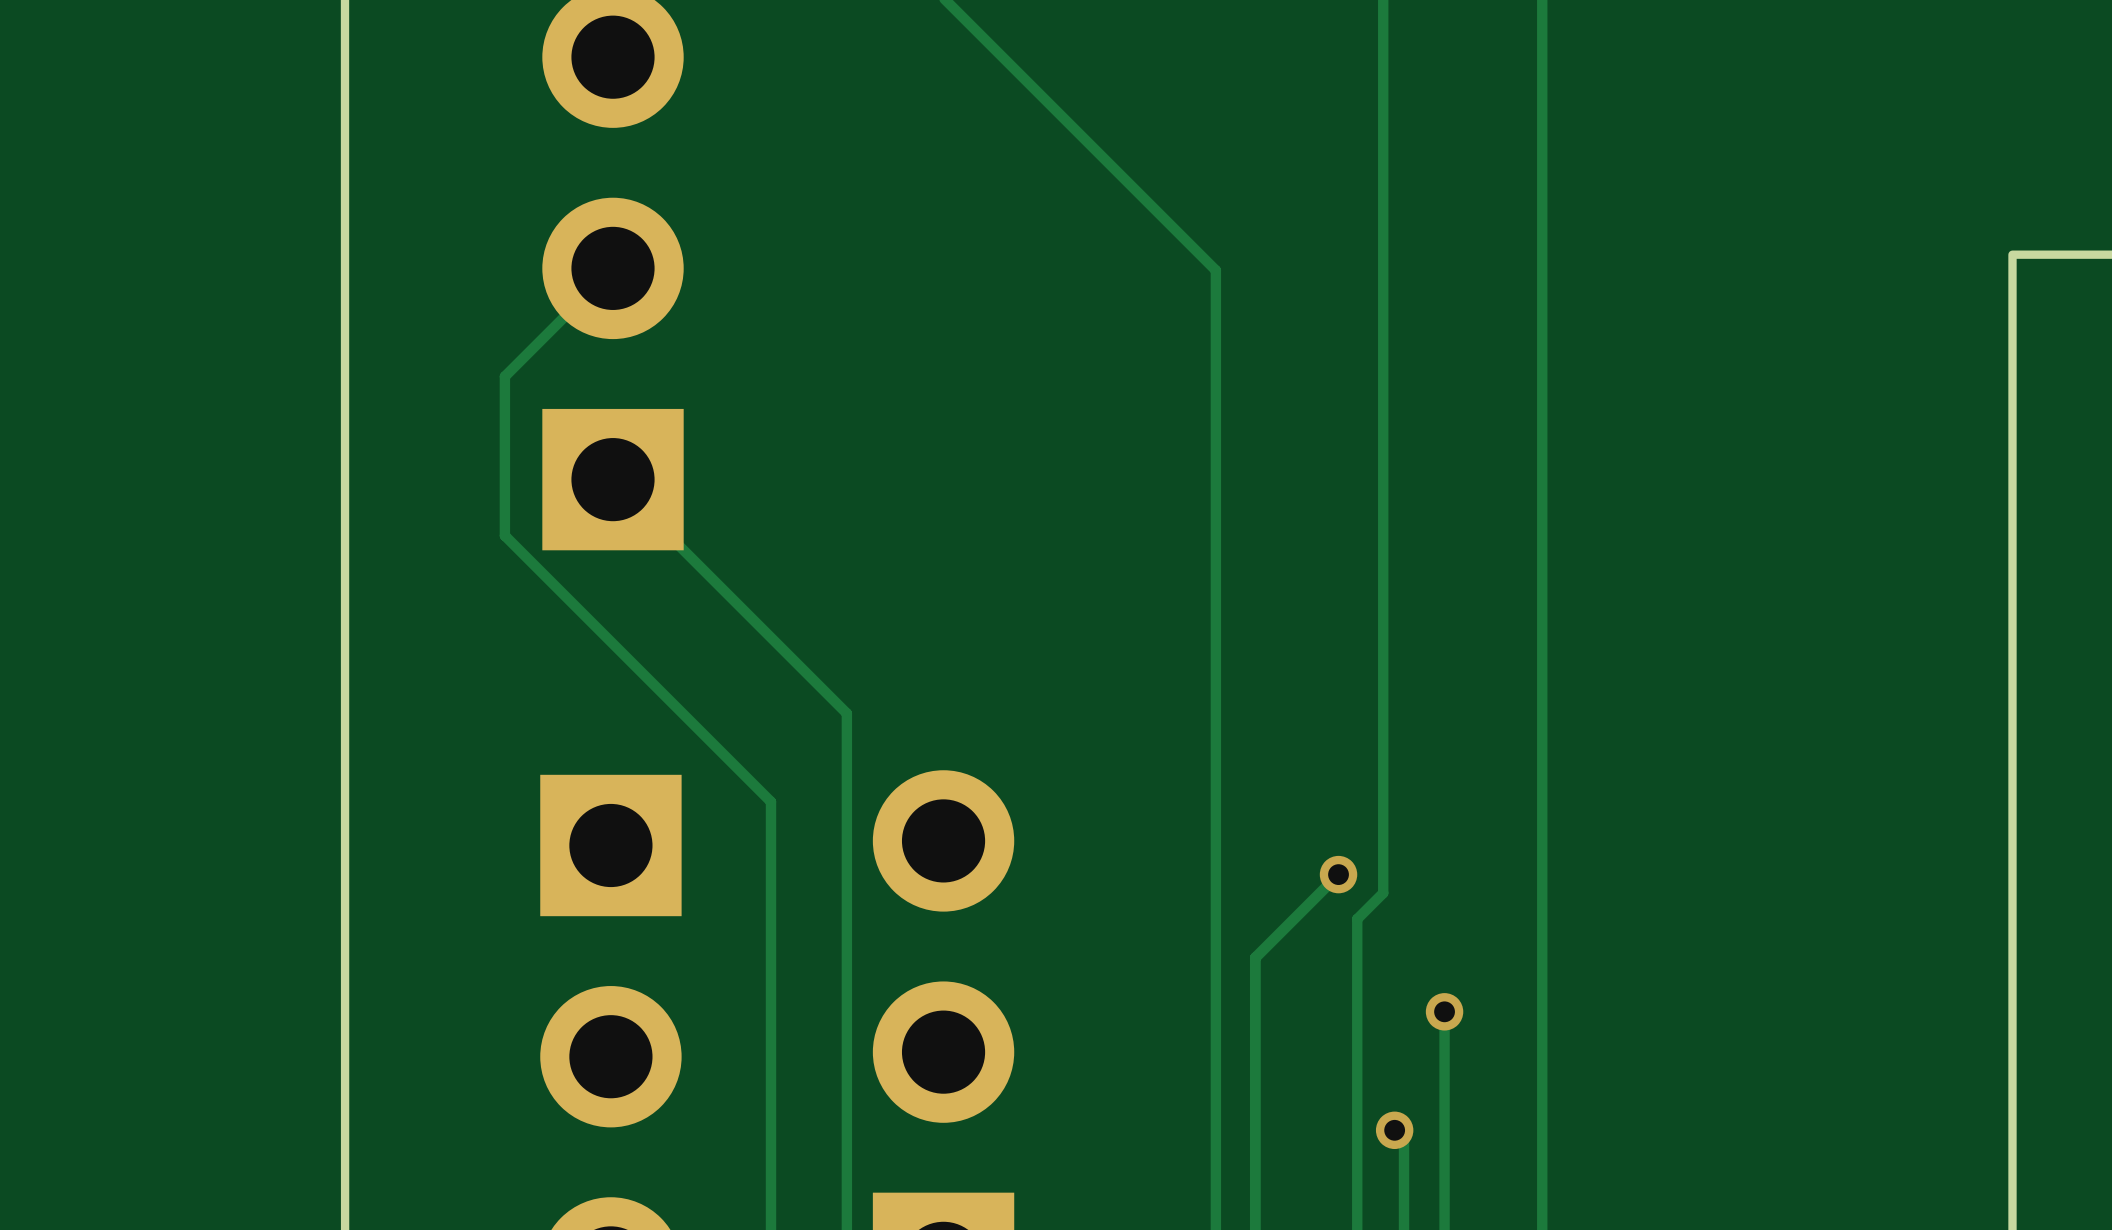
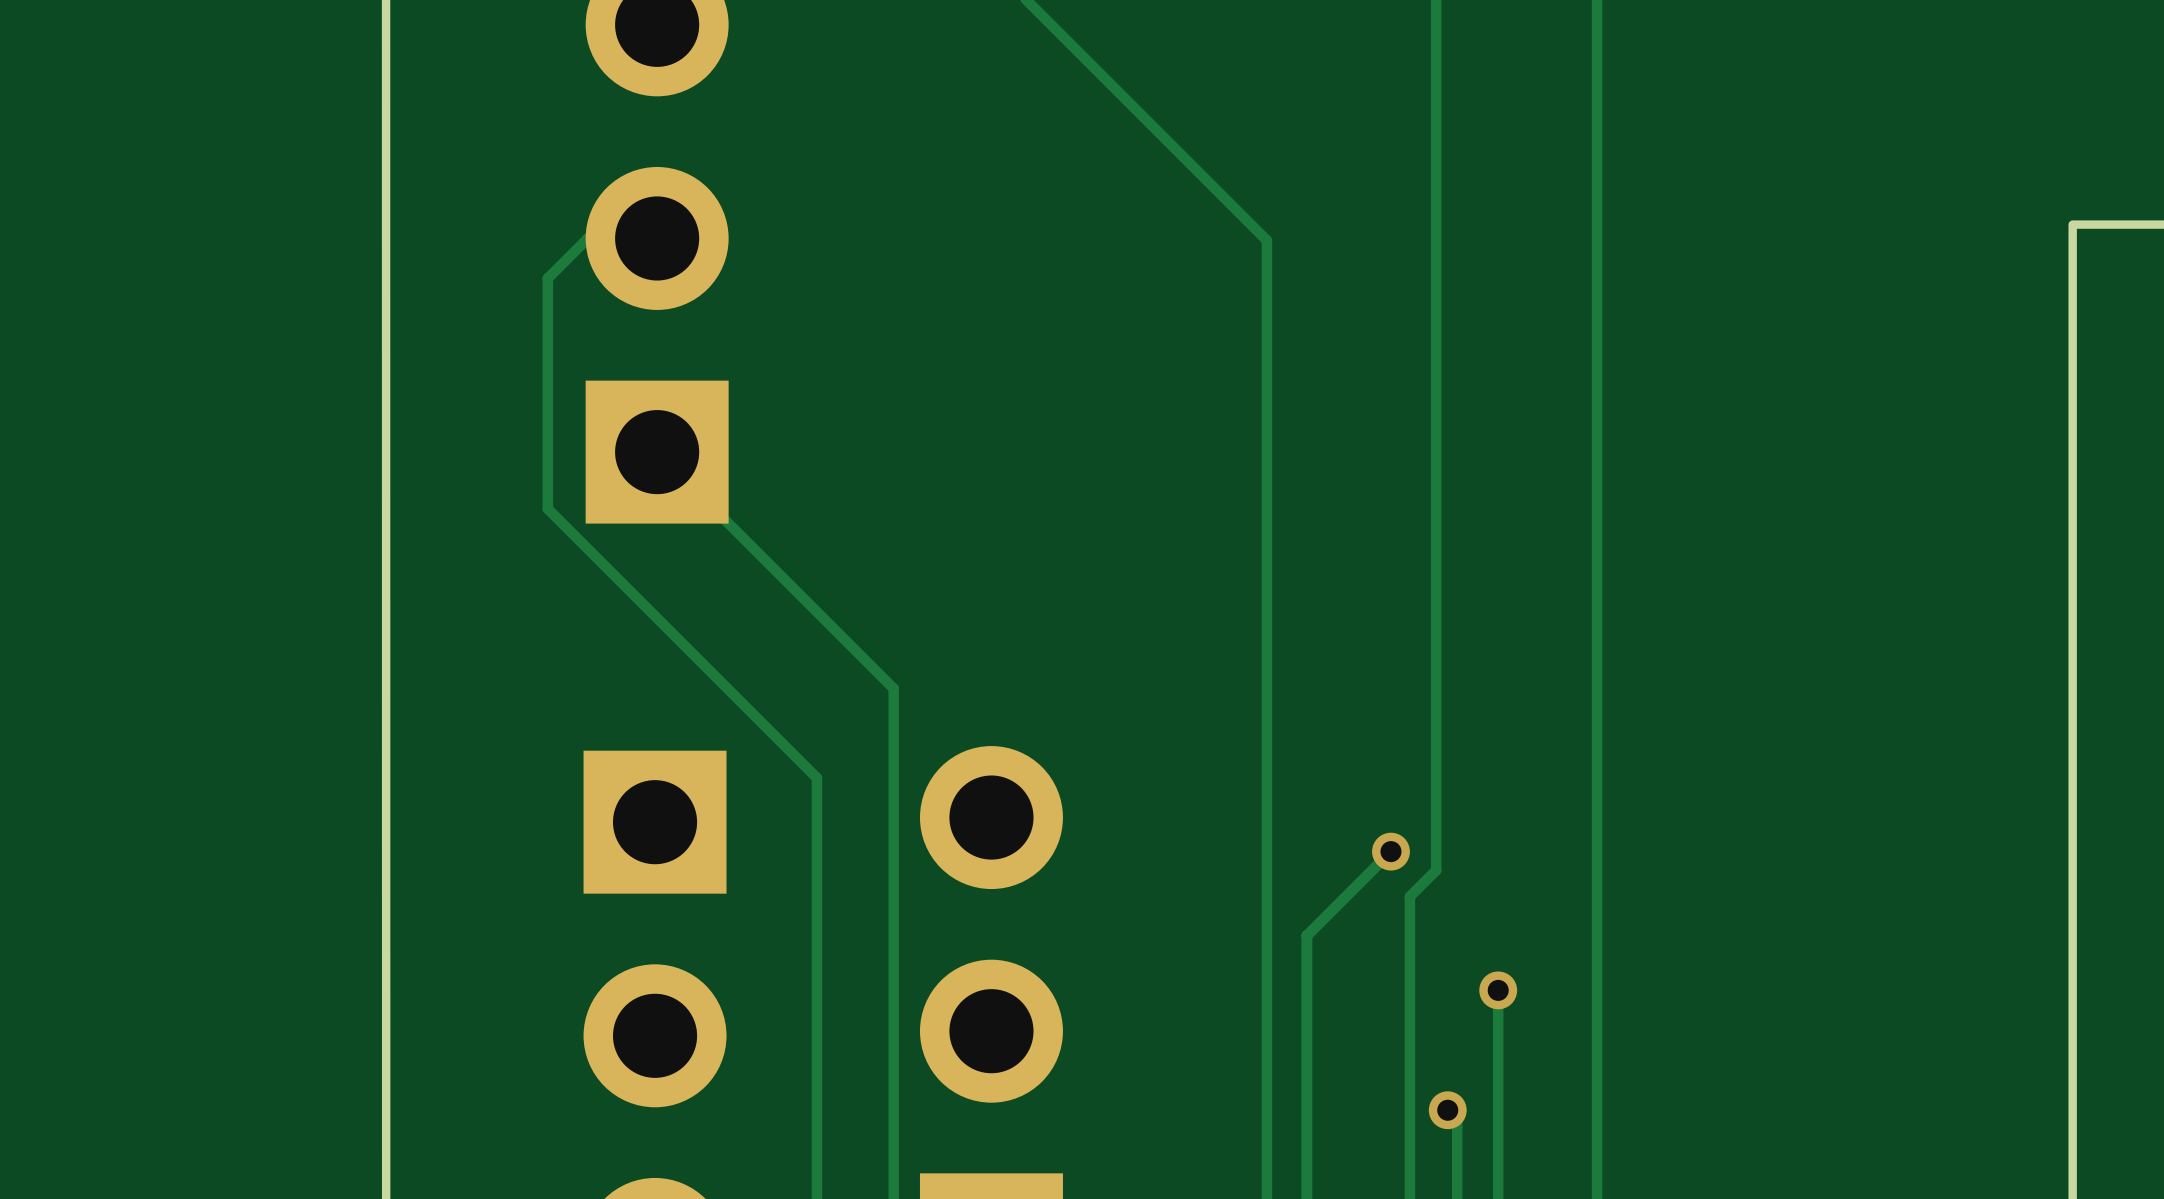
track: (613, 268) (504, 376) -> (657, 238) (587, 238) (547, 278) (547, 347)

